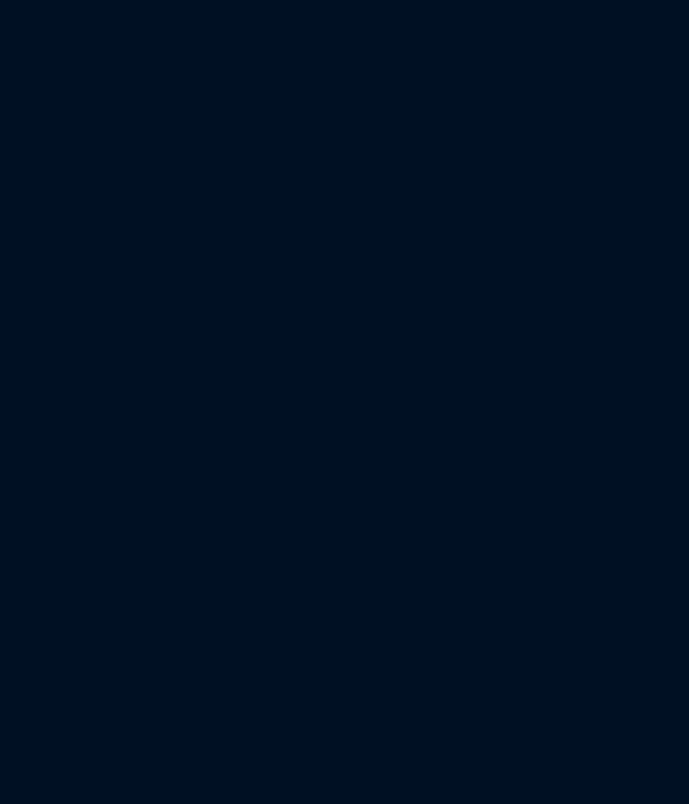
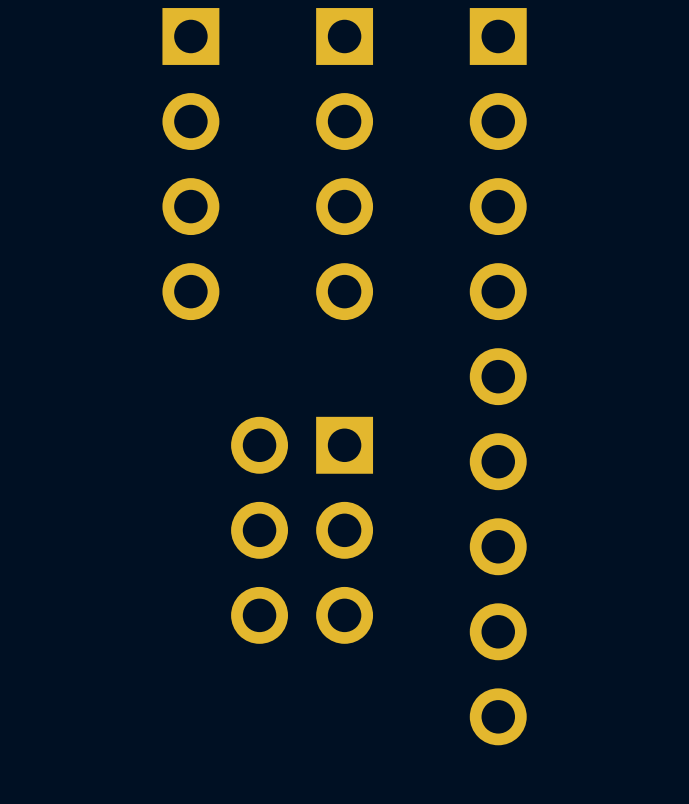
part: none -> (190, 164)
part: none -> (344, 164)
part: none -> (498, 376)
part: none -> (302, 530)

